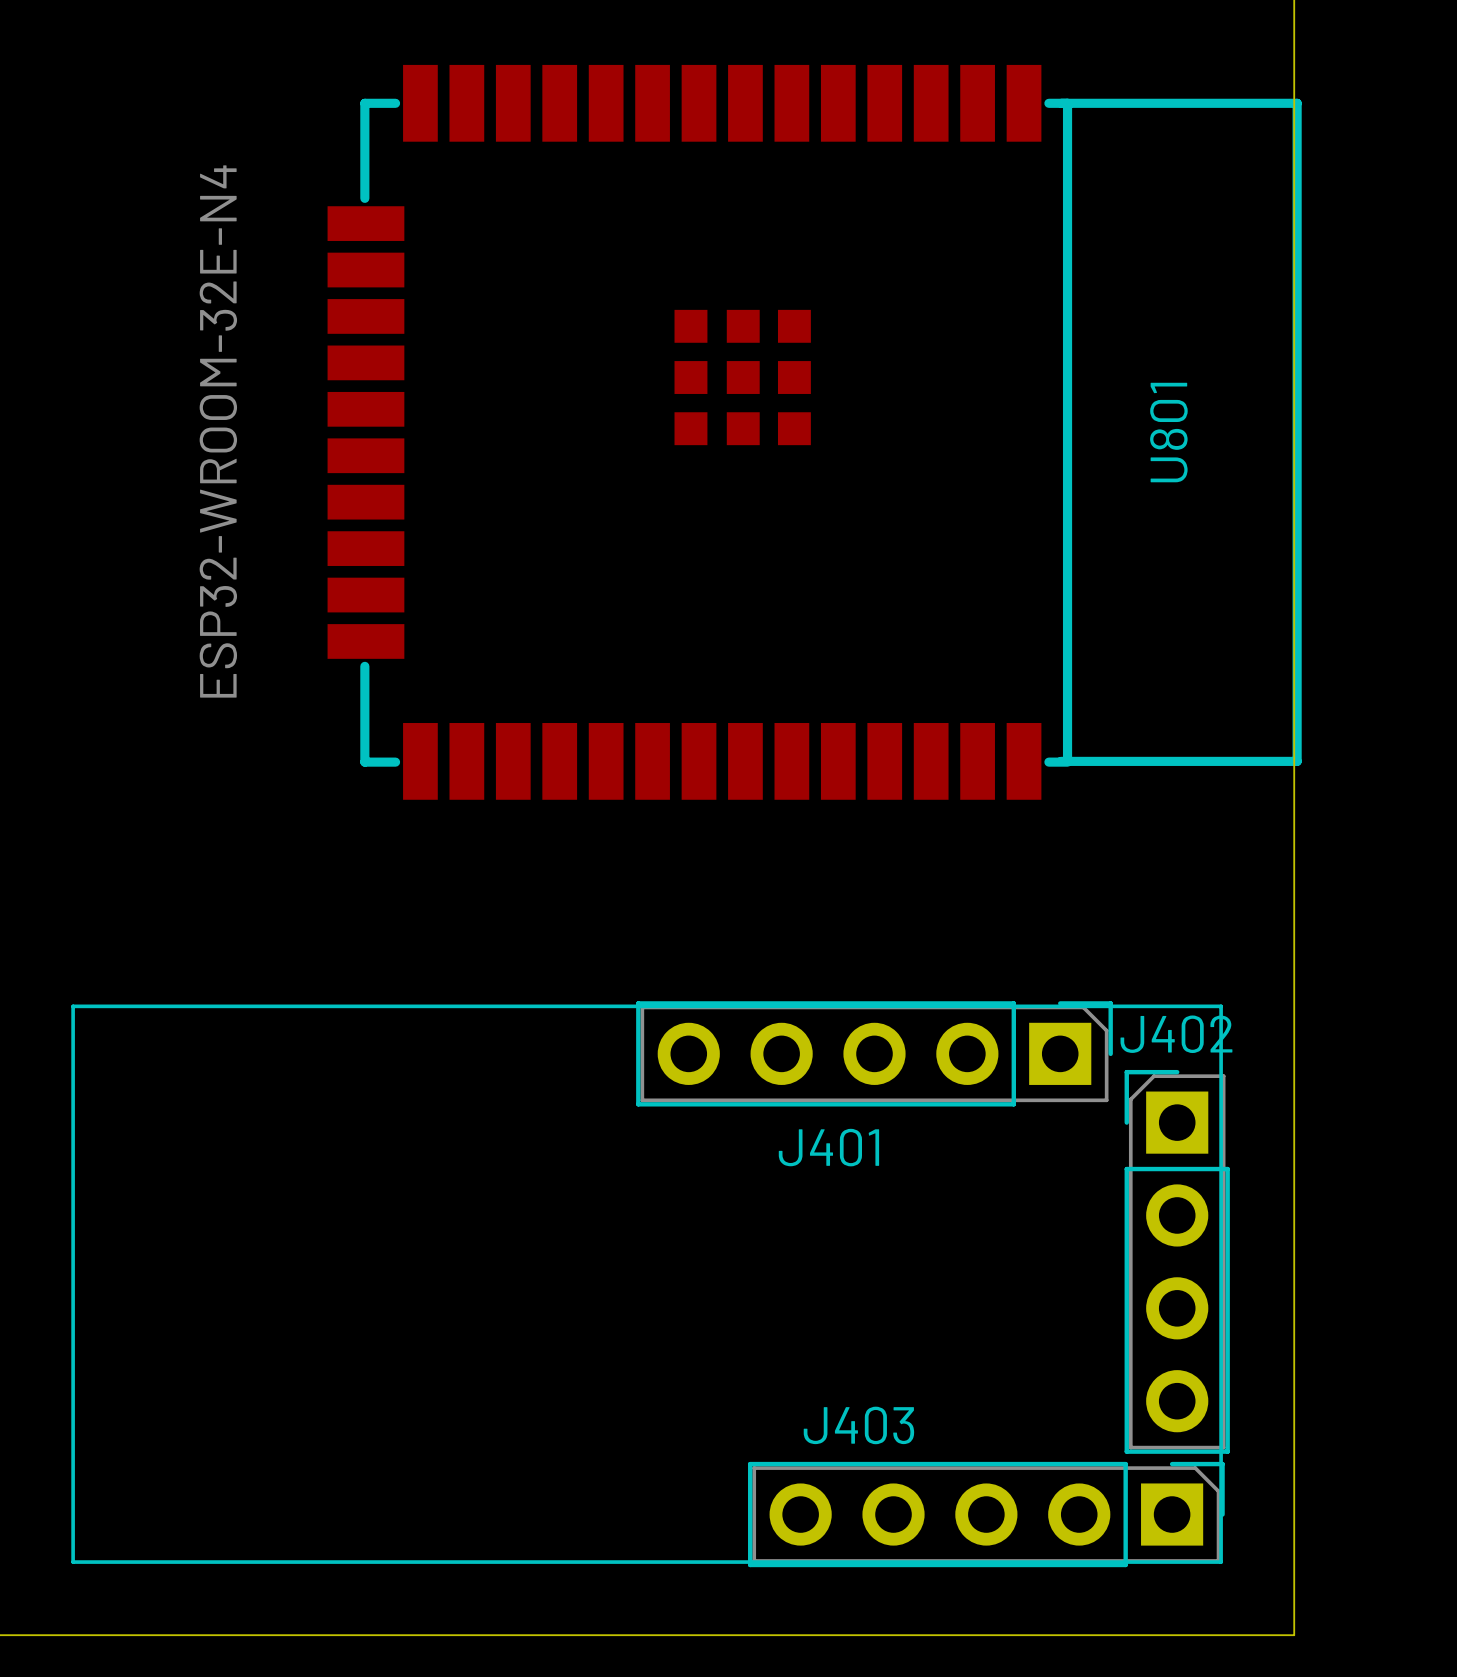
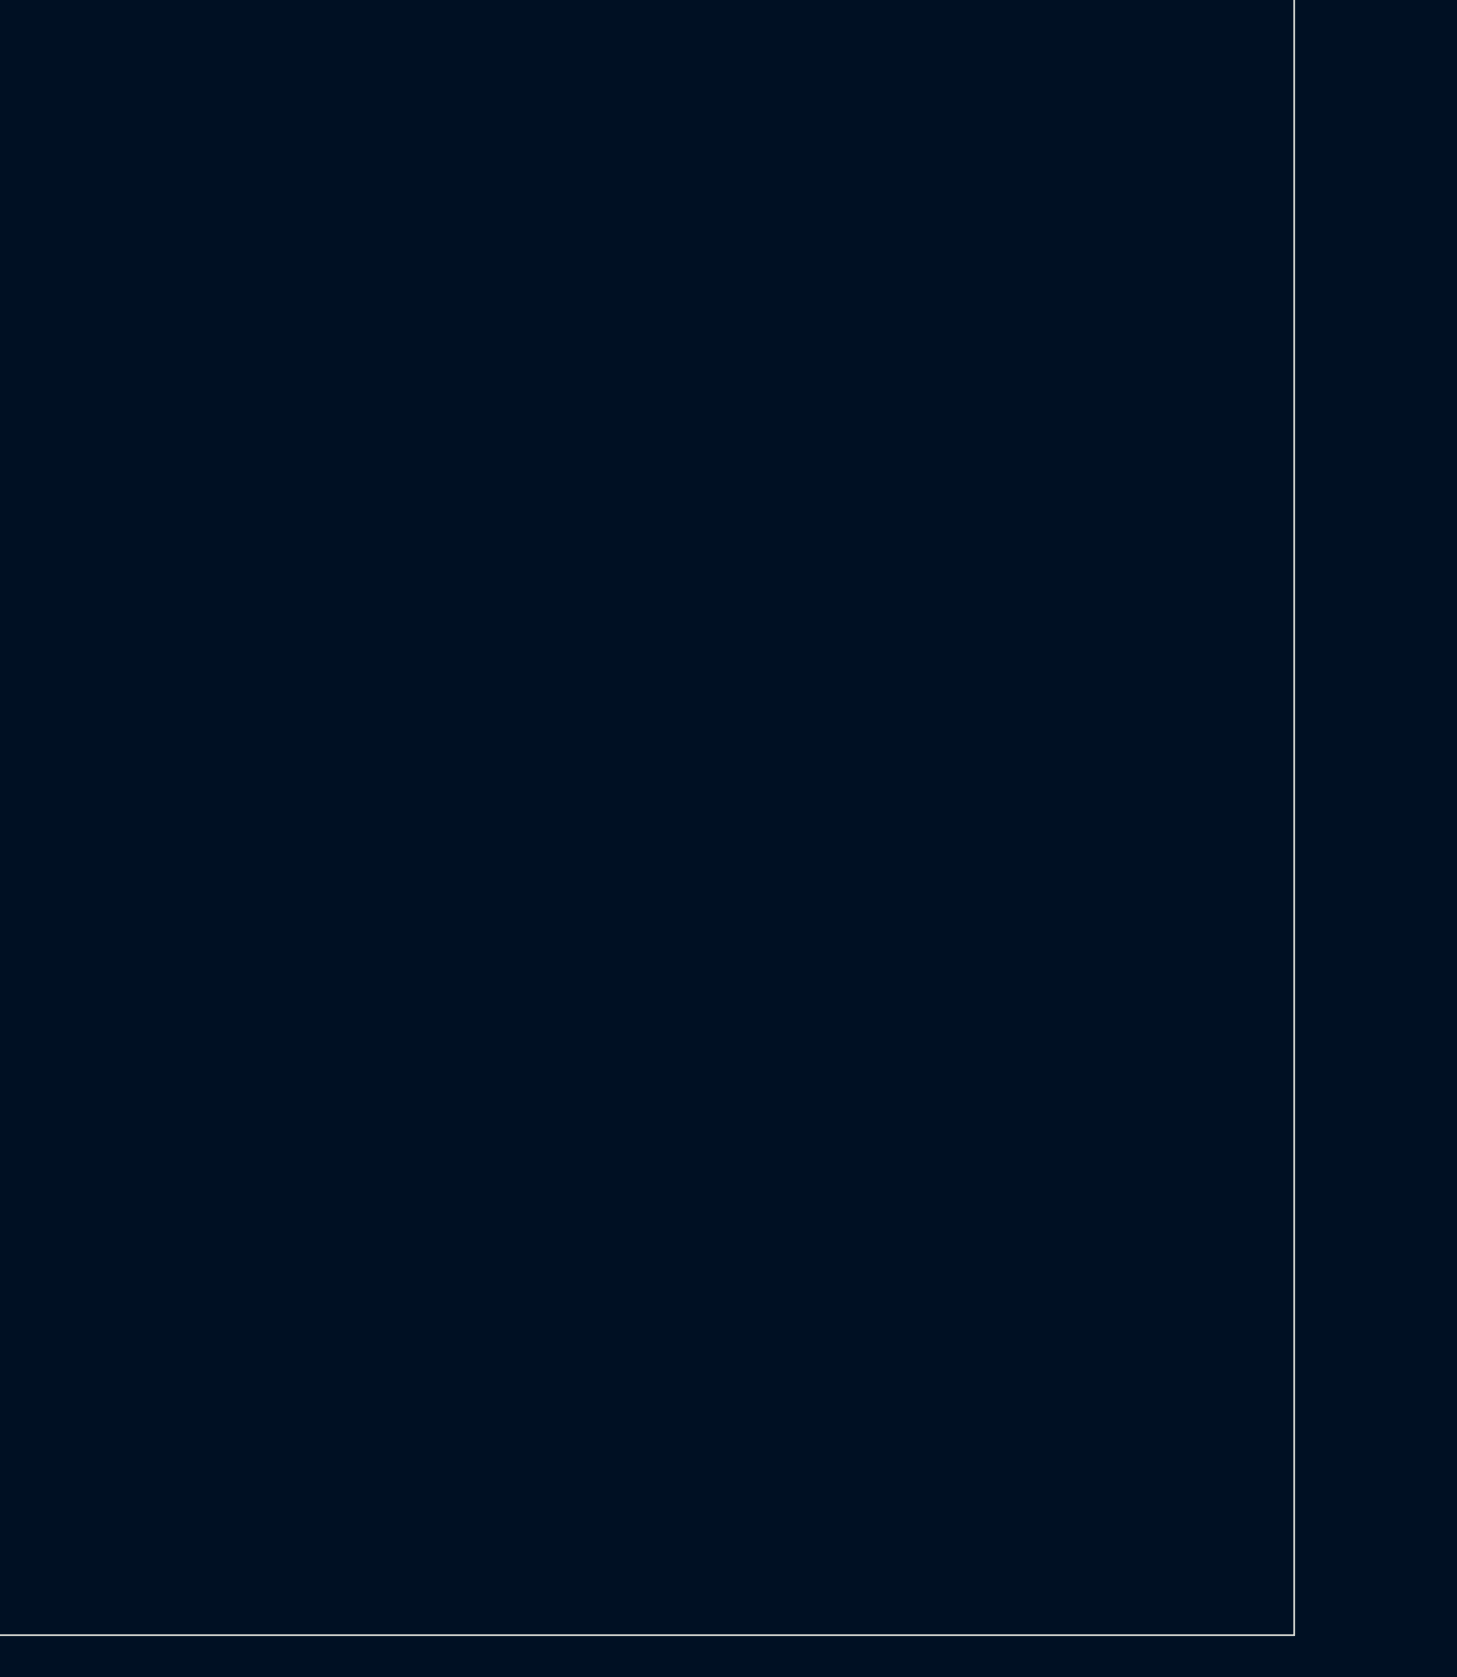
U801: ESP32-WROOM-32E-N4 (814, 432) -> none
line: (73, 1006) (1221, 1006) (1221, 1562) (73, 1562) (73, 1006) -> none
J401: (874, 1053) -> none
J402: (1177, 1261) -> none
J403: (986, 1514) -> none

